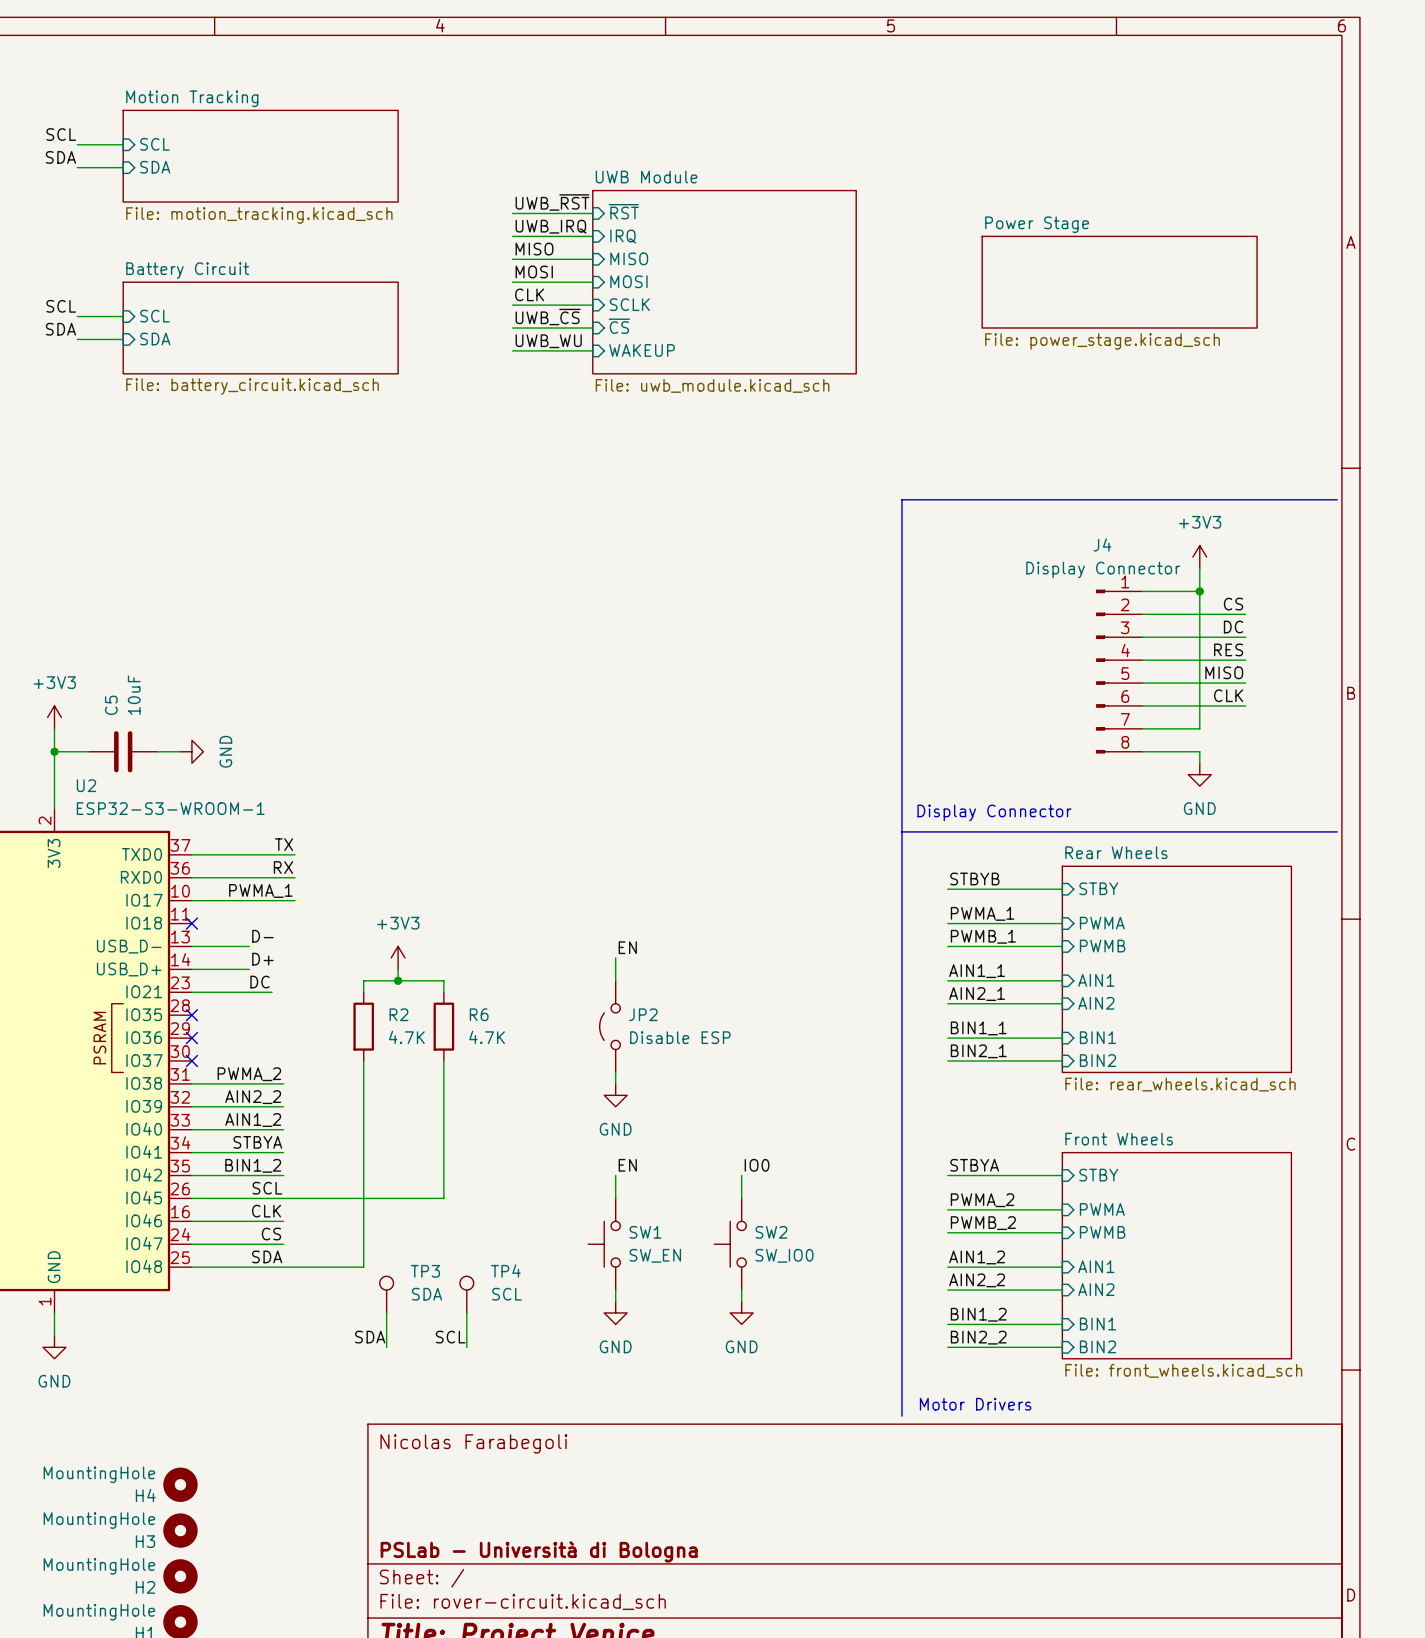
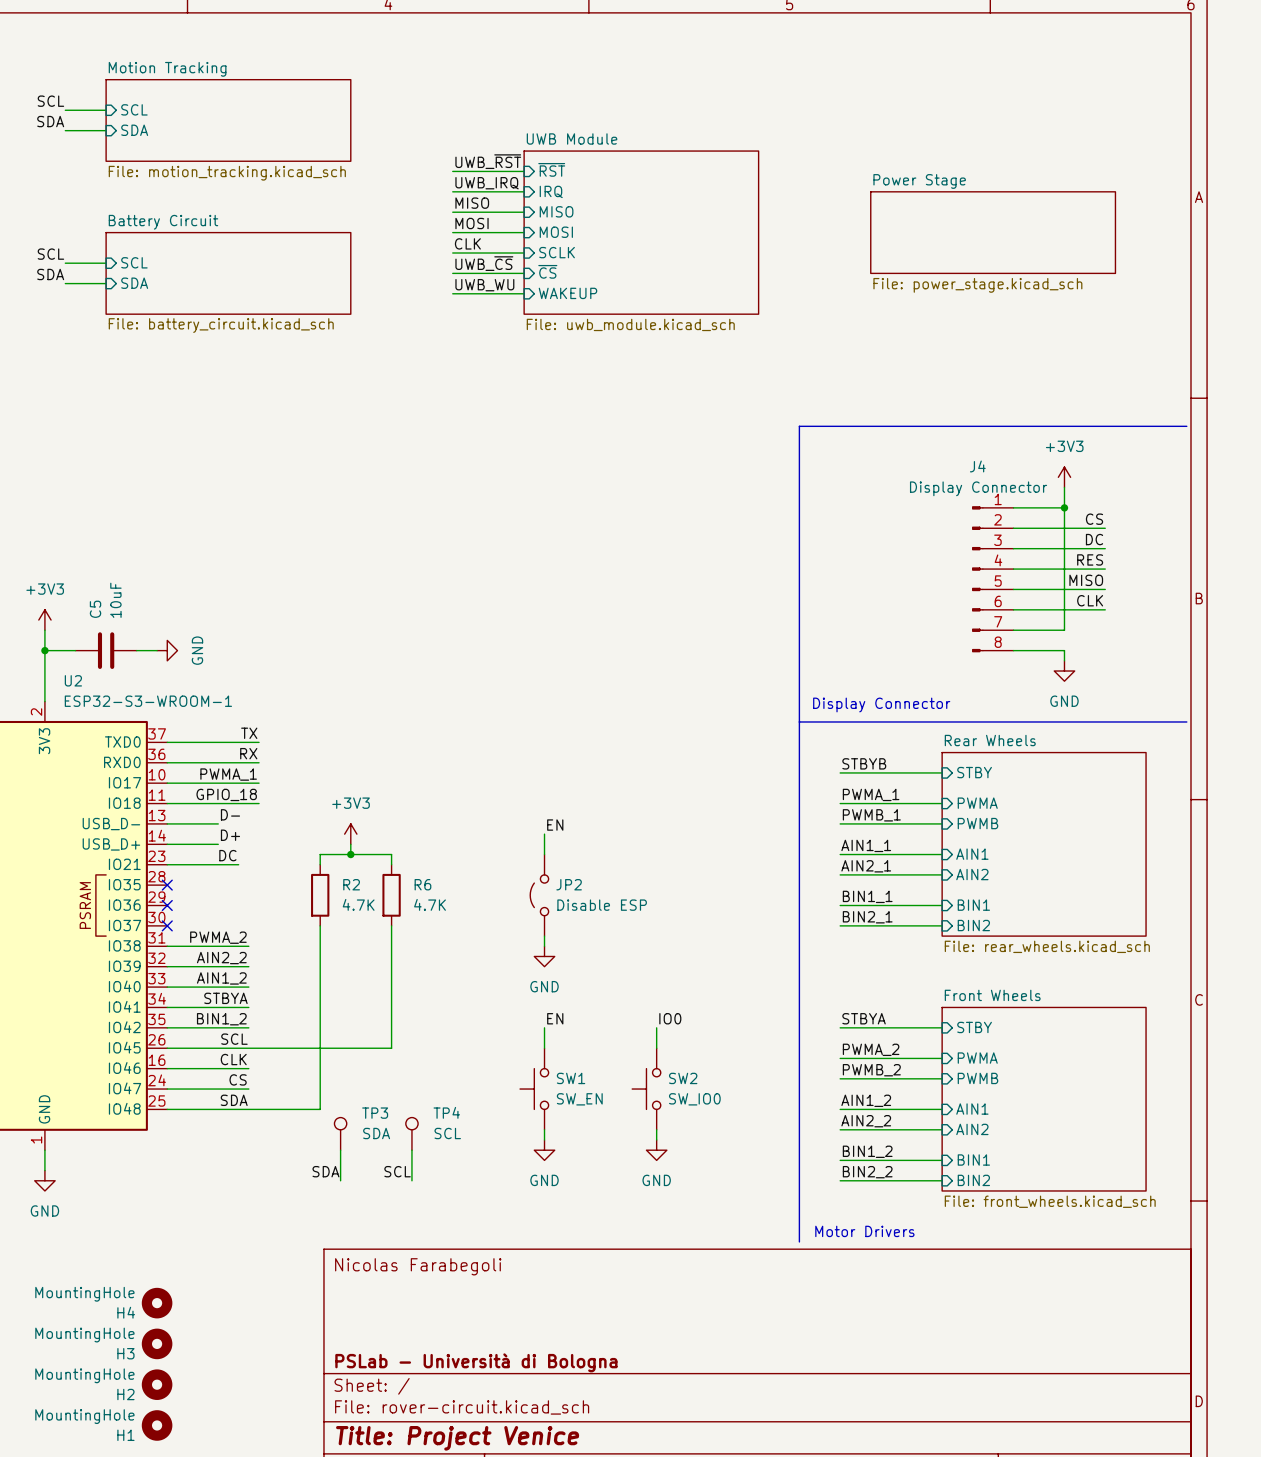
label: none -> GPIO_18 (226, 794)
wire: none -> (167, 803) (259, 803)
no-connect mark: (191, 923) -> none

